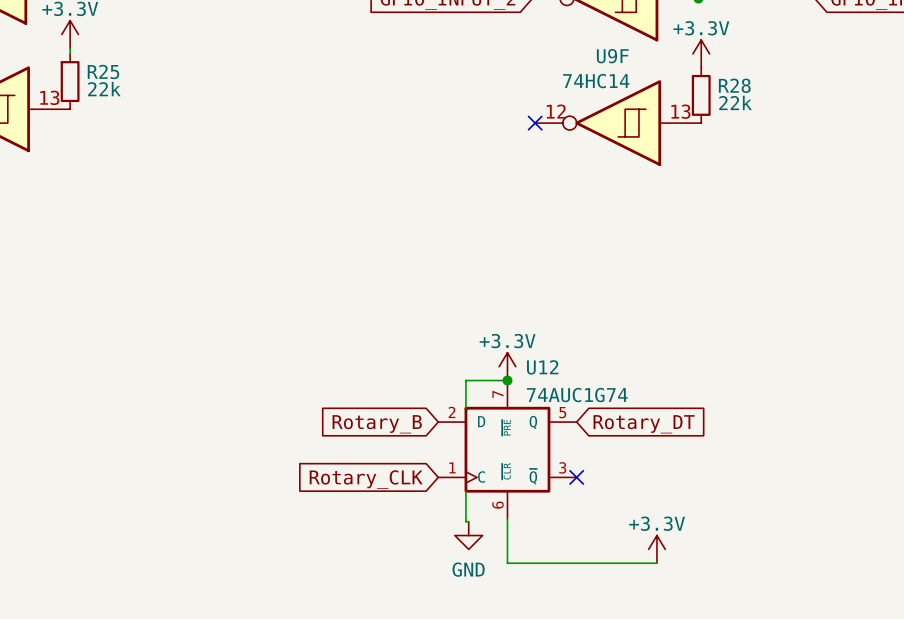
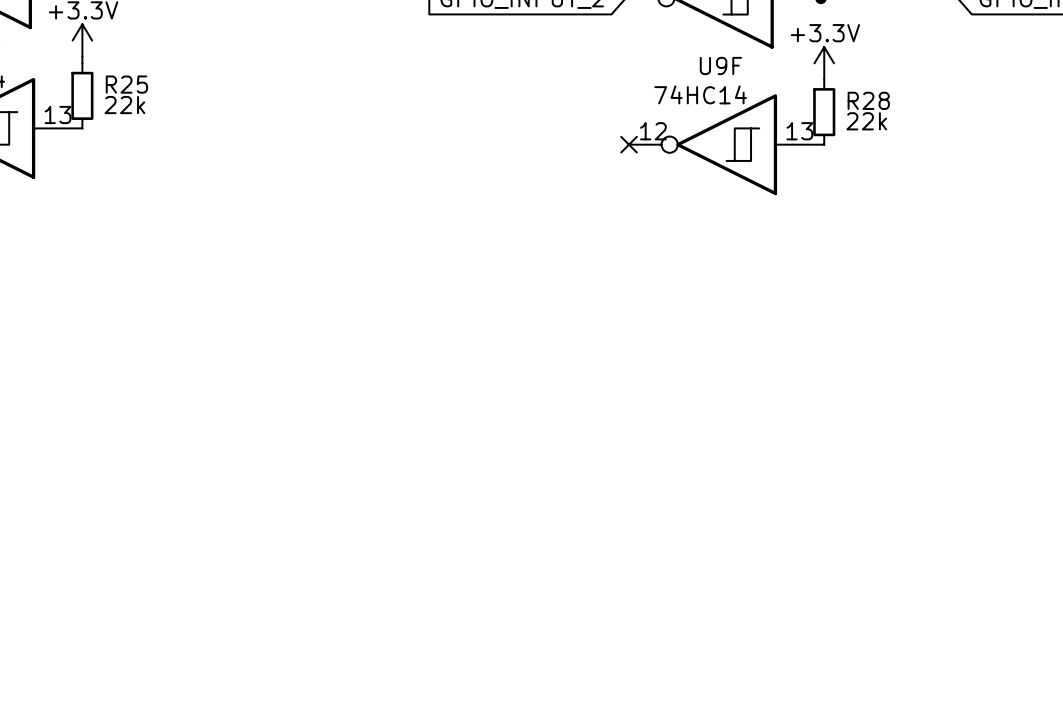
power symbol: +3.3V (507, 366) -> none
wire: (507, 380) (465, 380) (465, 408) -> none
junction: (507, 380) -> none
global label: Rotary_B (377, 424) -> none
global label: Rotary_DT (644, 424) -> none
U12: 74AUC1G74 (507, 449) -> none
no-connect mark: (576, 477) -> none
global label: Rotary_CLK (366, 479) -> none
wire: (465, 491) (465, 521) (468, 521) -> none
wire: (507, 518) (507, 563) (656, 563) -> none
power symbol: GND (468, 535) -> none
power symbol: +3.3V (656, 549) -> none

